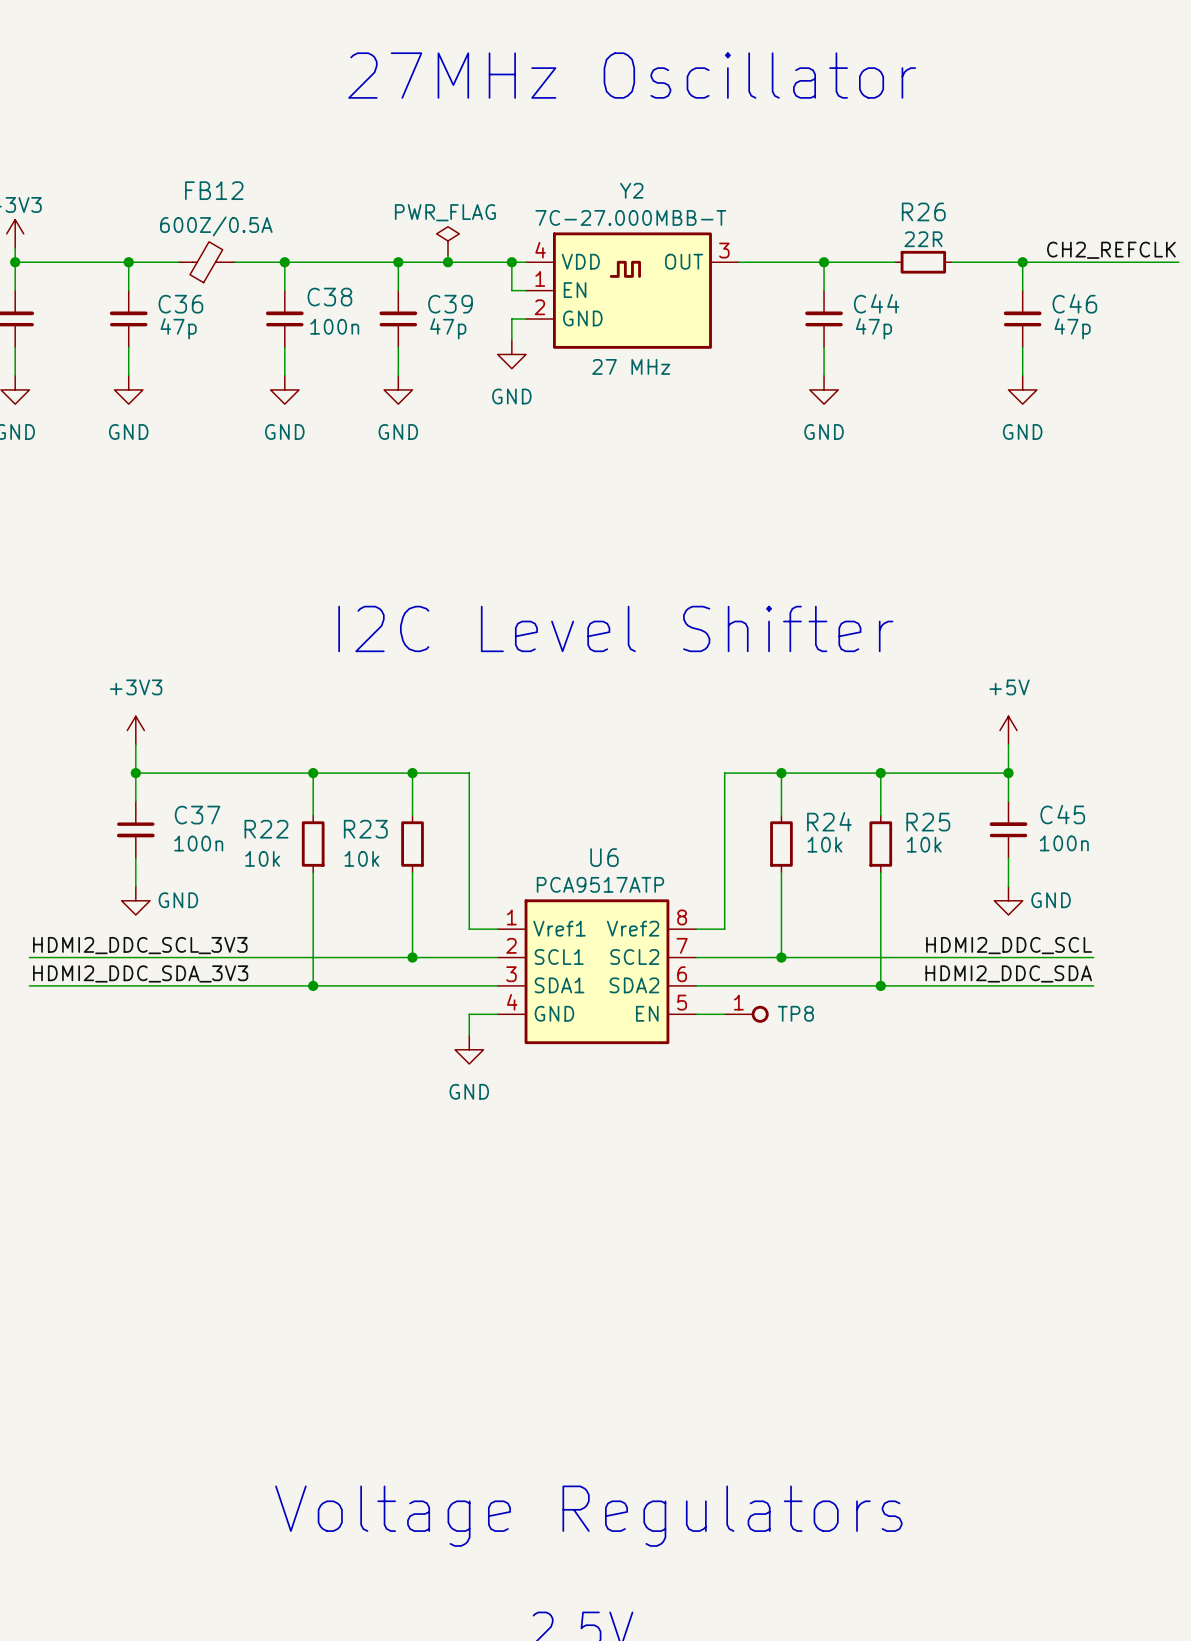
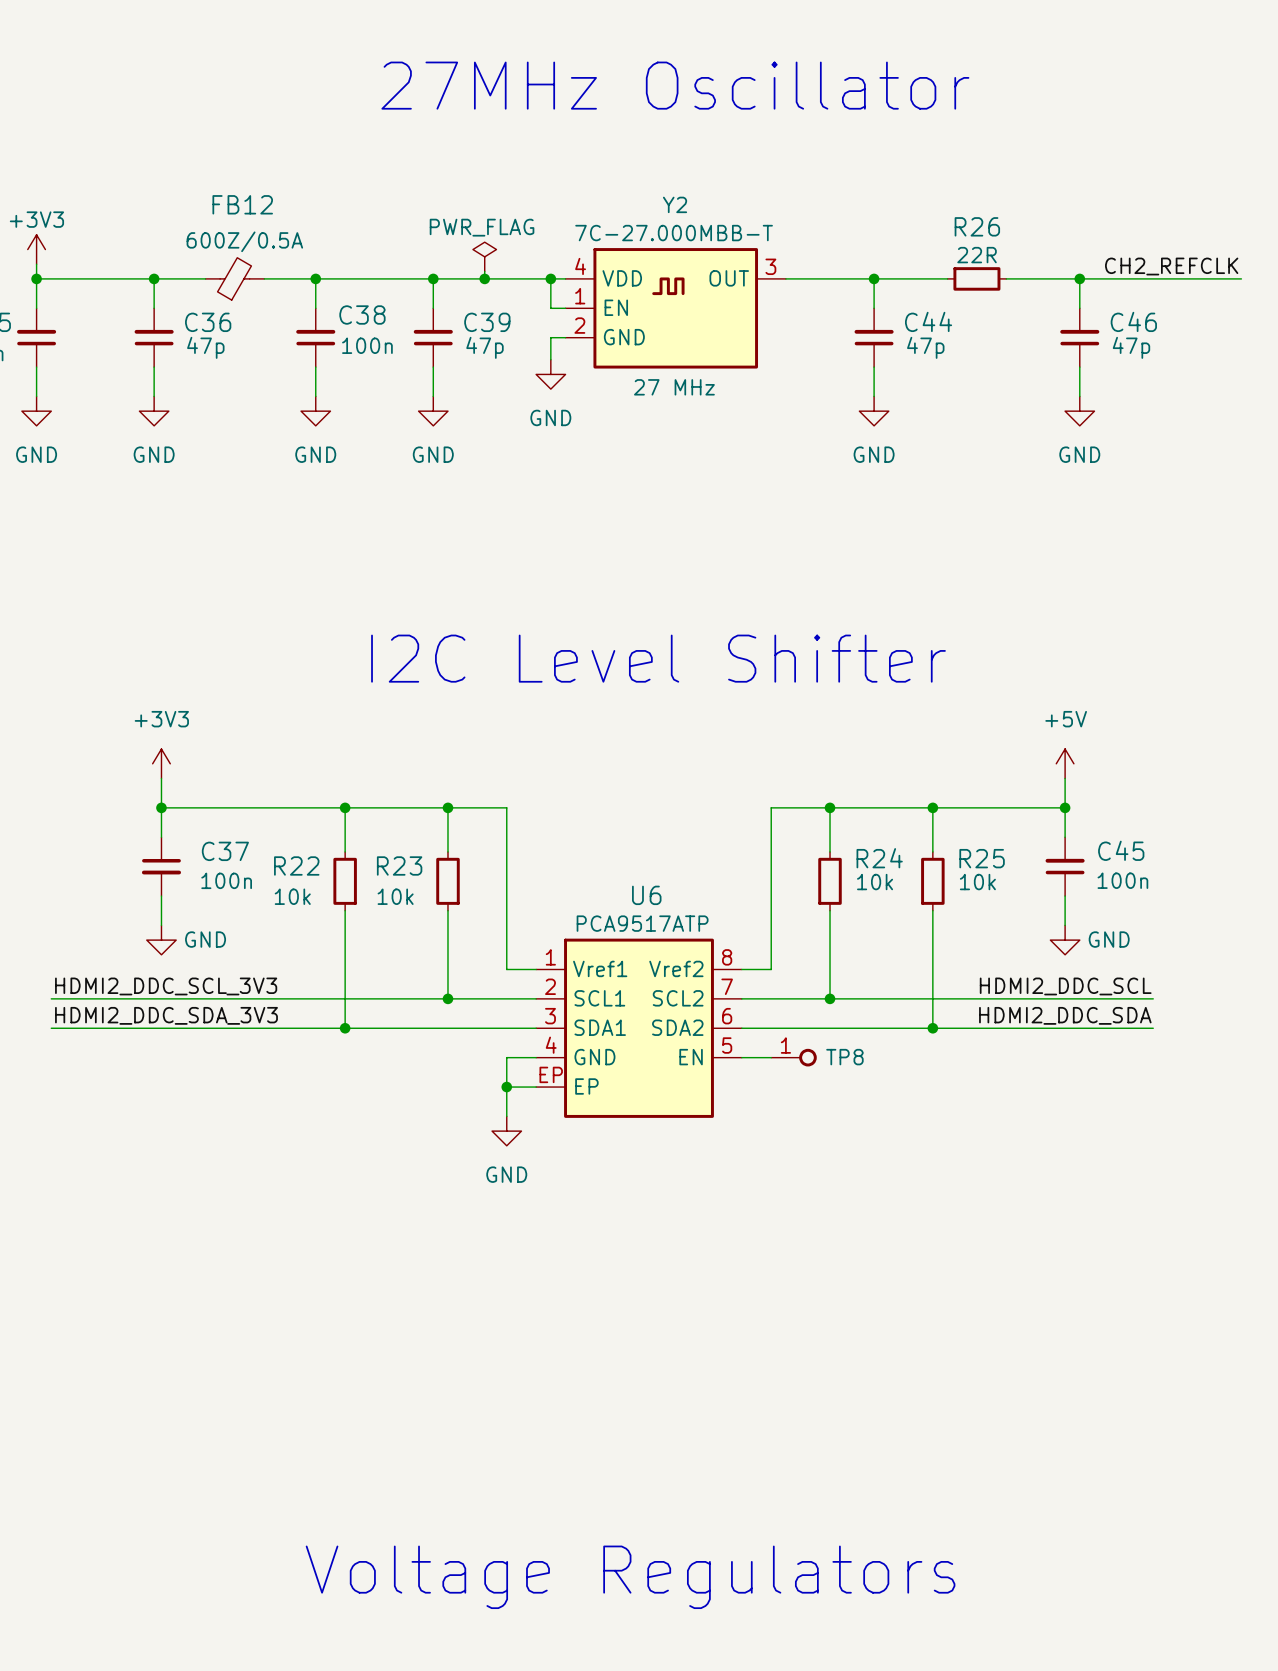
U6 symbol: [497, 899, 697, 1045] -> [536, 938, 742, 1118]
wire: none -> (506, 1079) (506, 1116)
wire: none -> (506, 1087) (536, 1087)
junction: none -> (506, 1087)
power symbol position: GND (469, 1049) -> GND (506, 1131)

